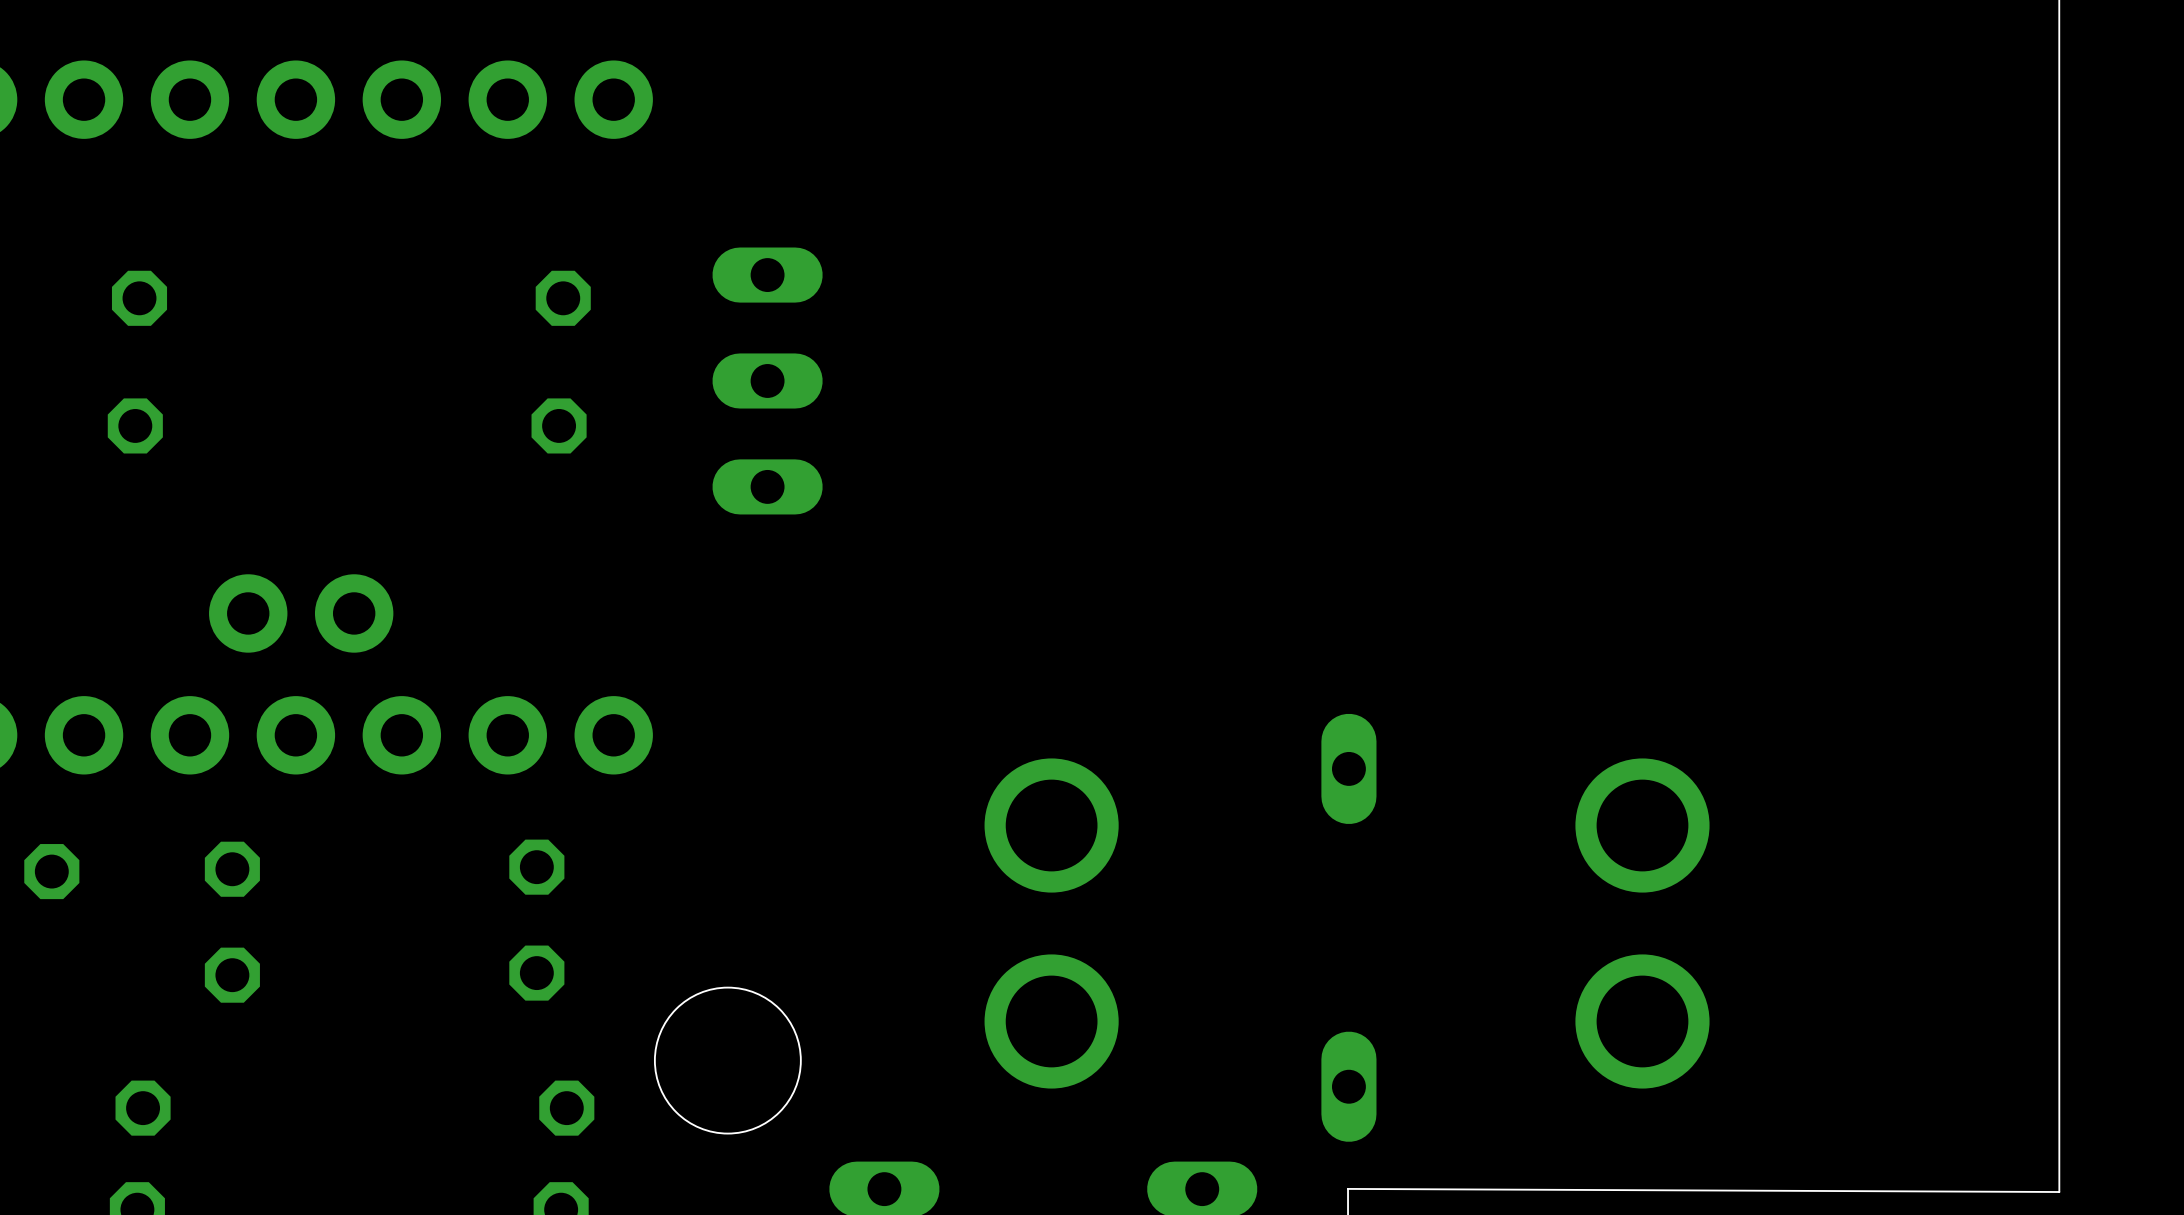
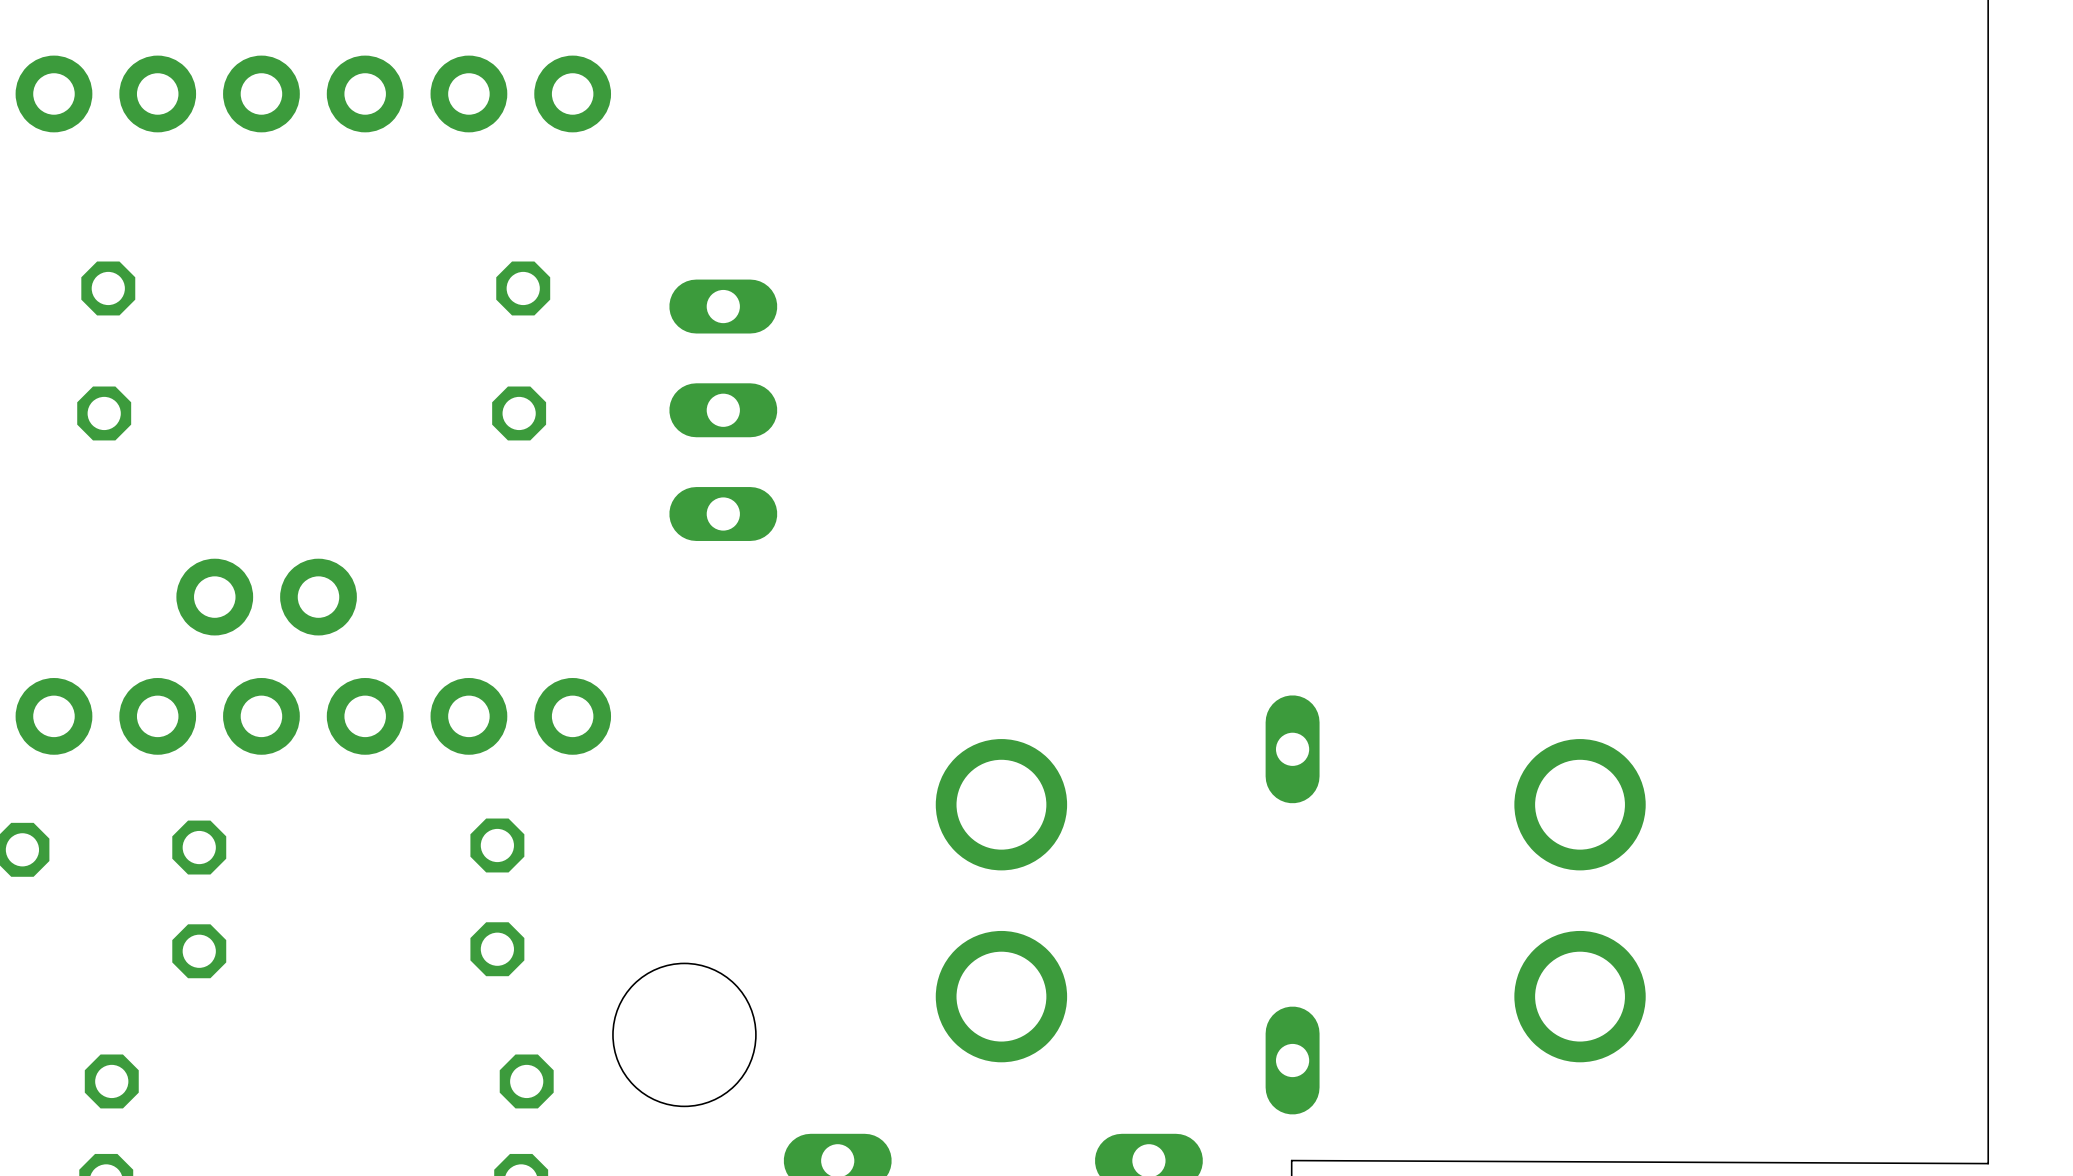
part position: (767, 380) -> (723, 410)

